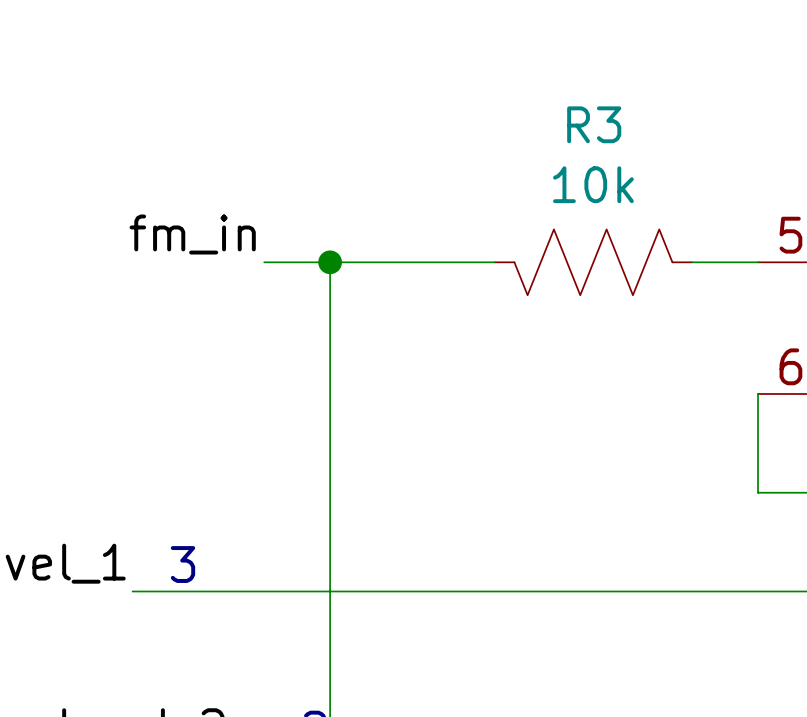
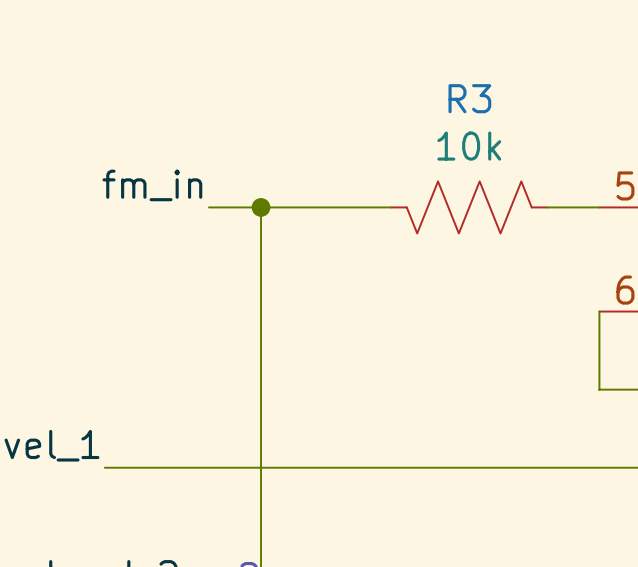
text: 3 (183, 564) -> none

